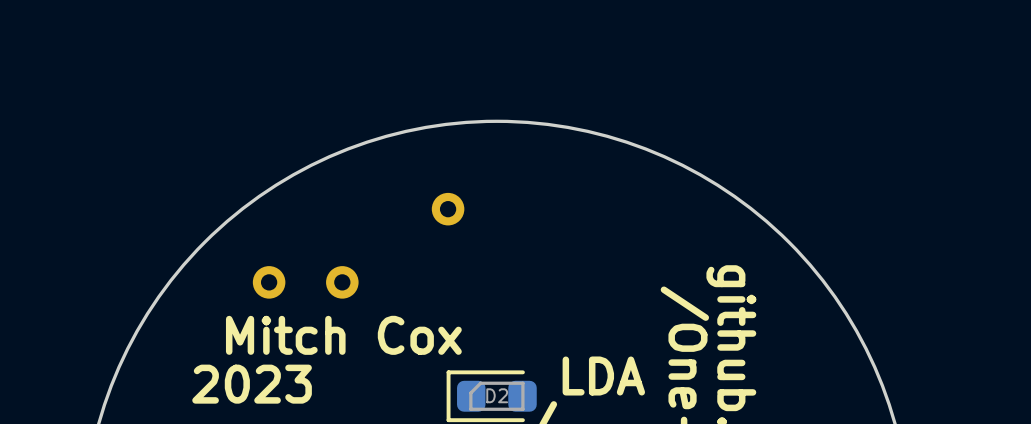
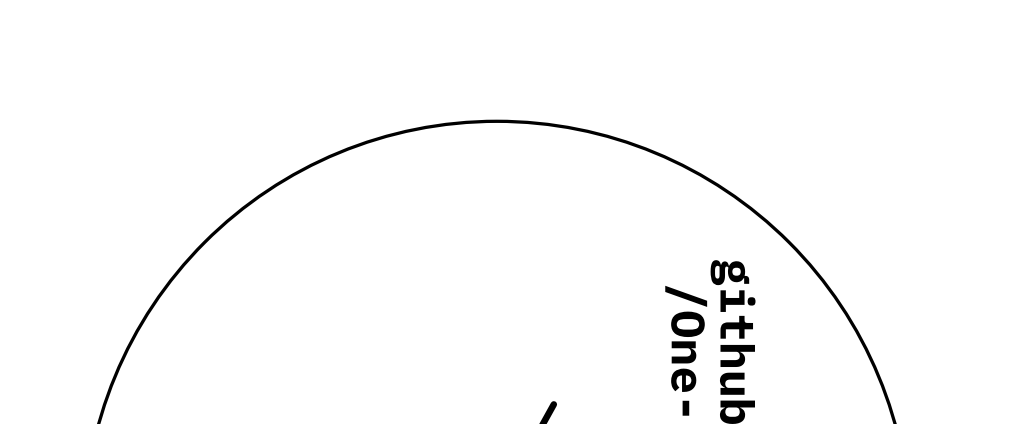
part: (448, 209) -> none
part: (269, 282) -> none
part: (342, 282) -> none
text: Mitch Cox (343, 335) -> none
text: LDA (603, 376) -> none
text: 2023 (252, 384) -> none
D2: (491, 396) -> none

